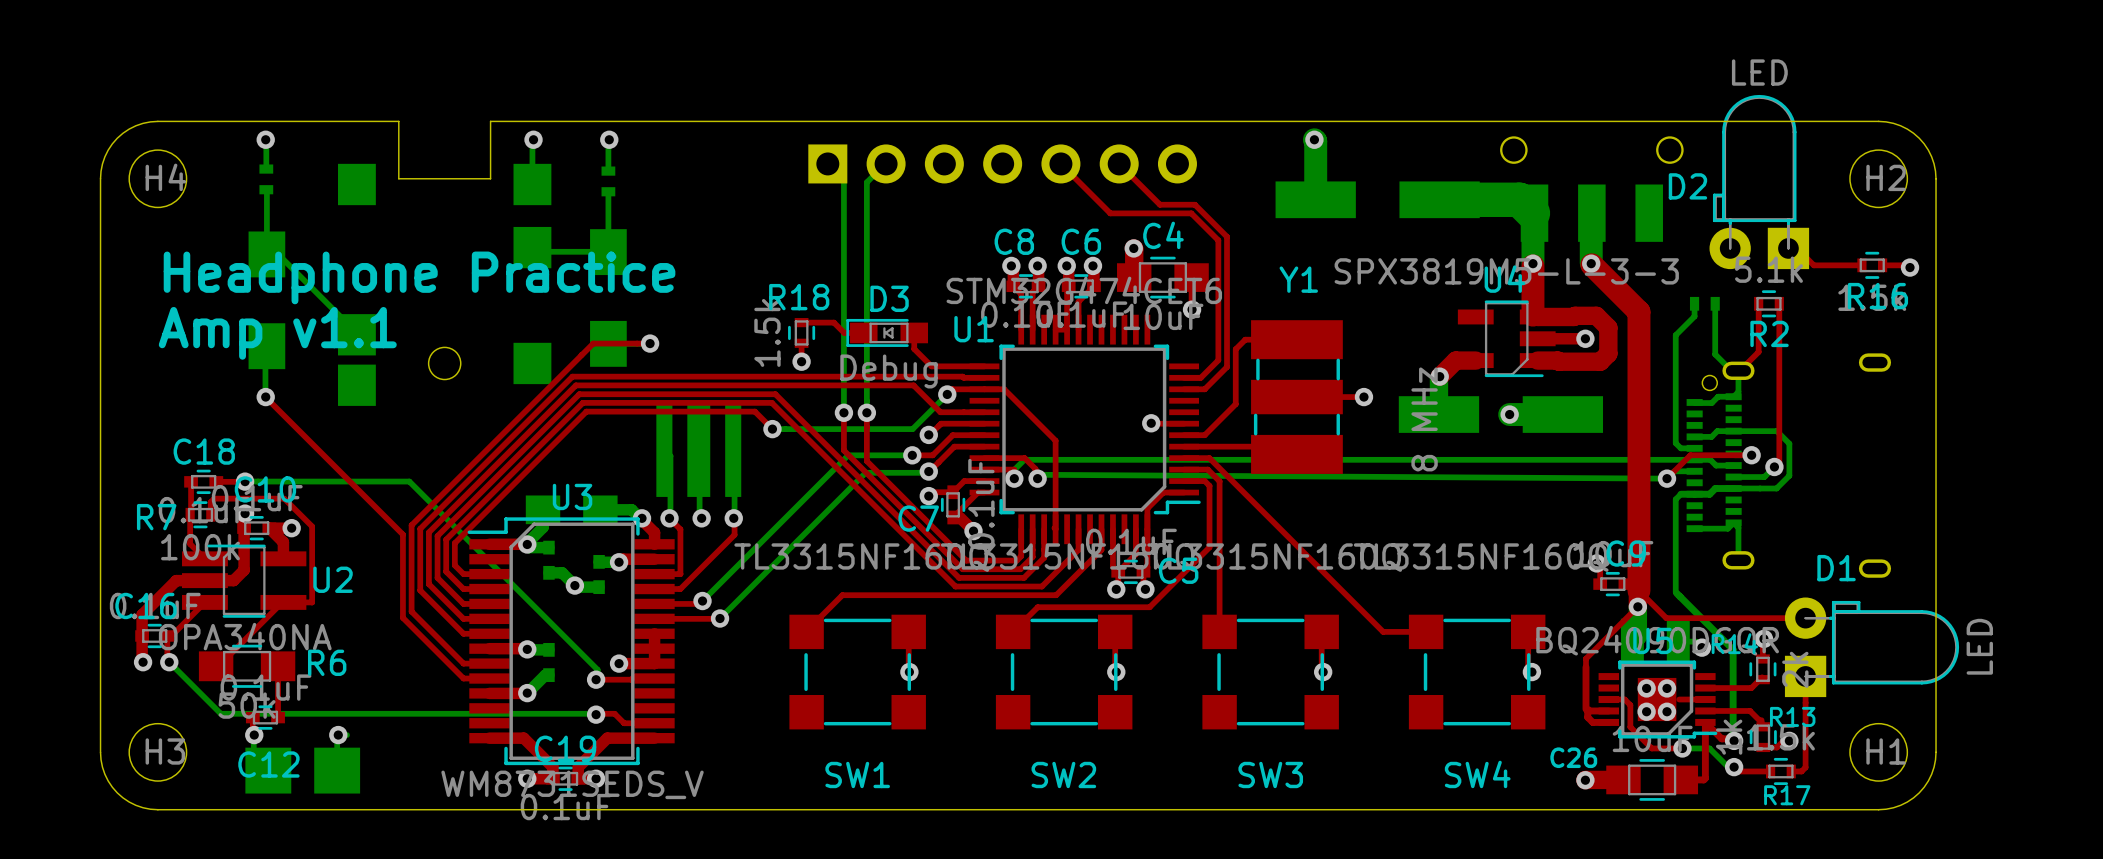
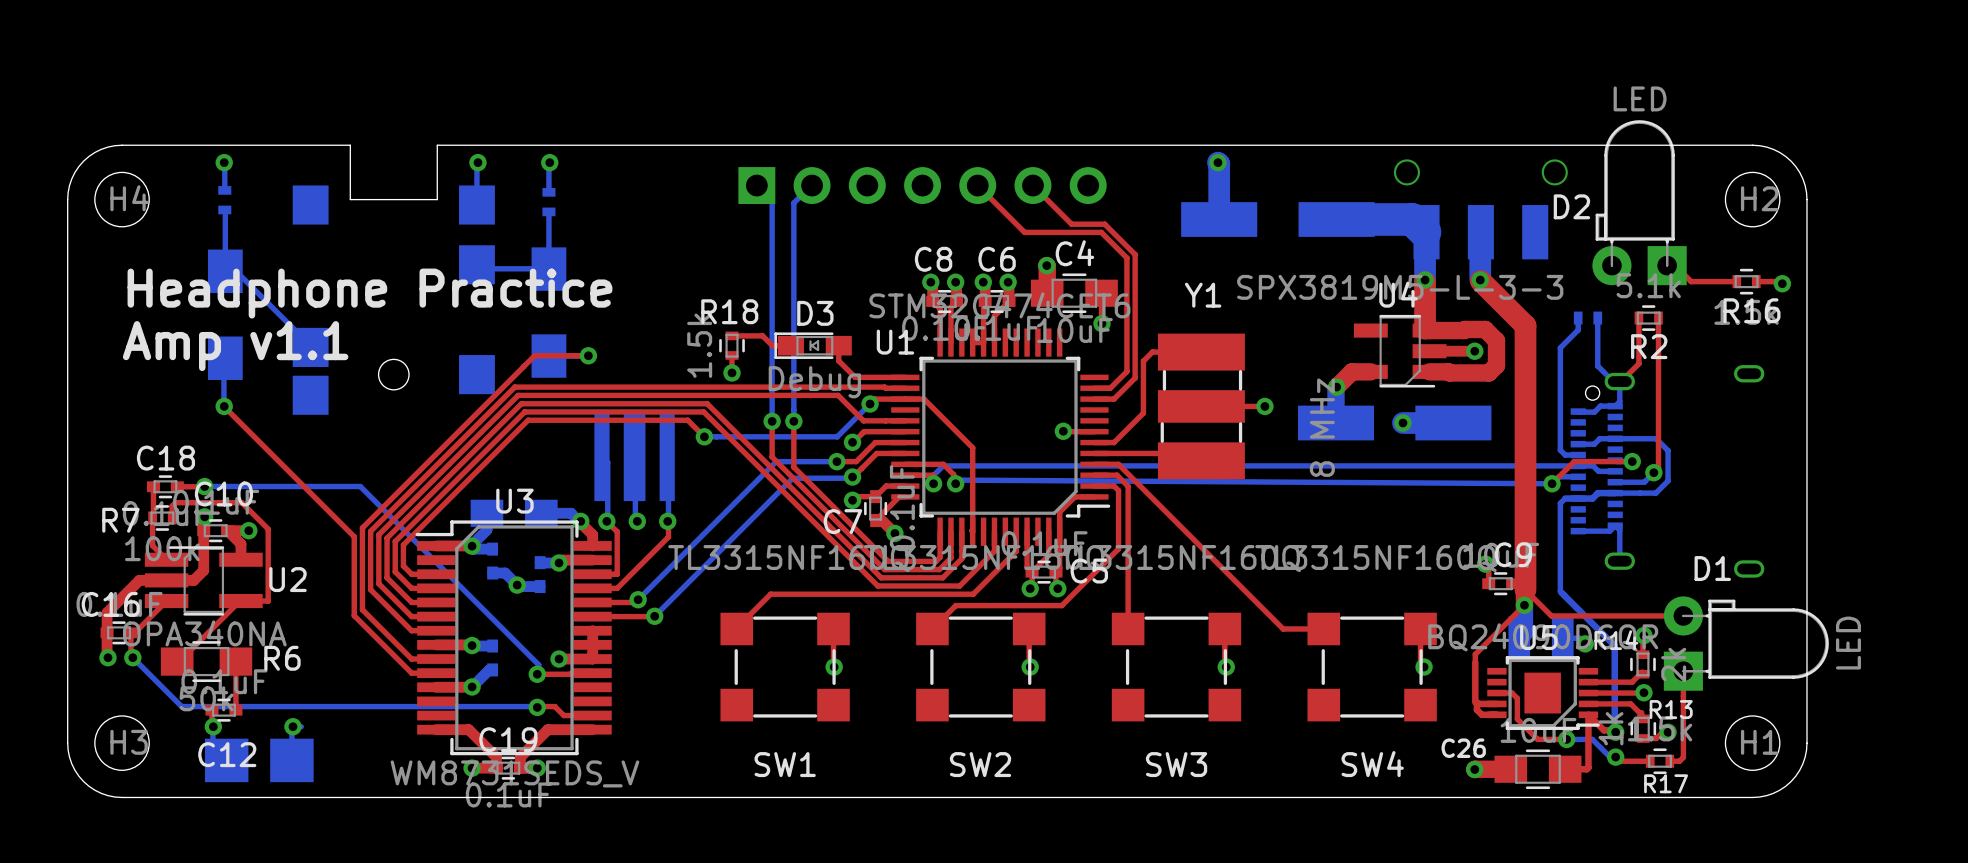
via: (1646, 688) -> none
via: (1667, 688) -> none
top track: (1679, 699) (1705, 699) -> (1644, 692) (1588, 693)
via: none -> (1643, 692)
via: (1646, 711) -> none
via: (1667, 711) -> none

